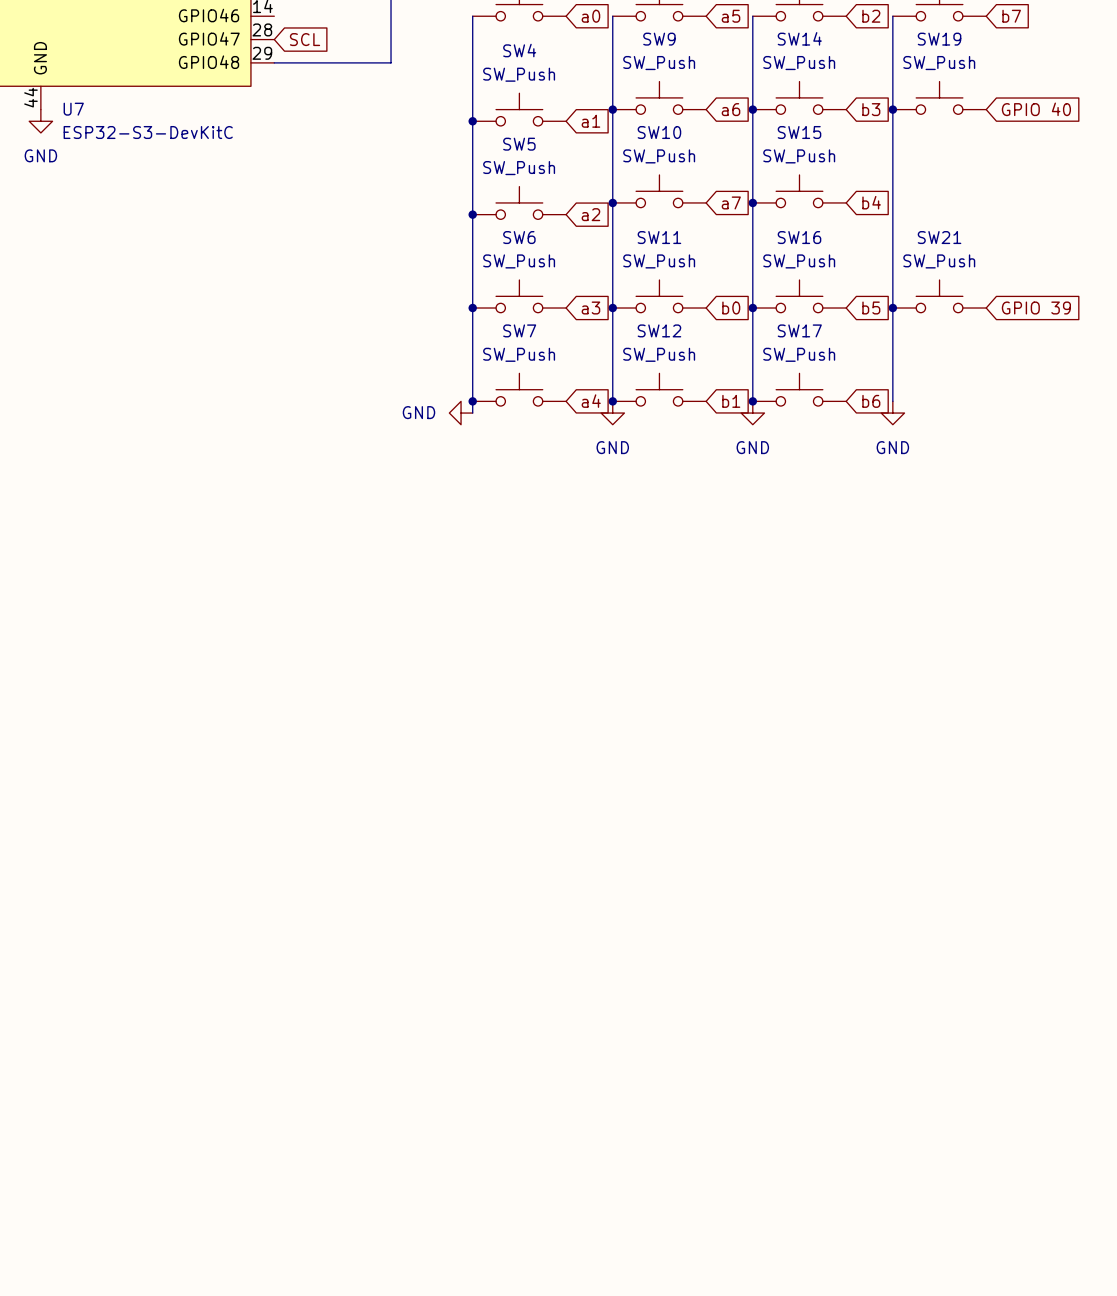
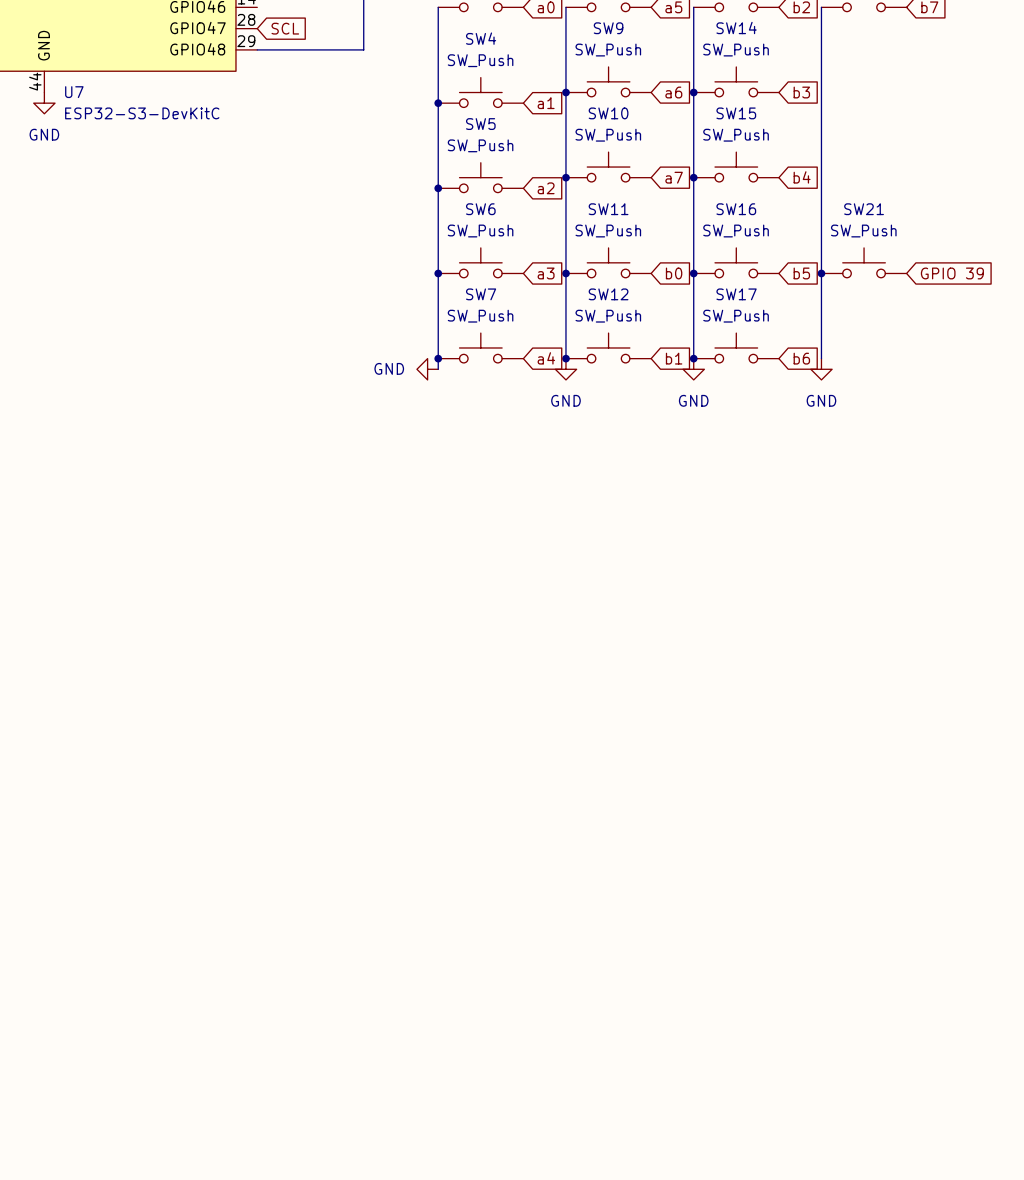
SW19: SW_Push (939, 97) -> none
junction: (892, 109) -> none
global label: GPIO 40 (1036, 109) -> none

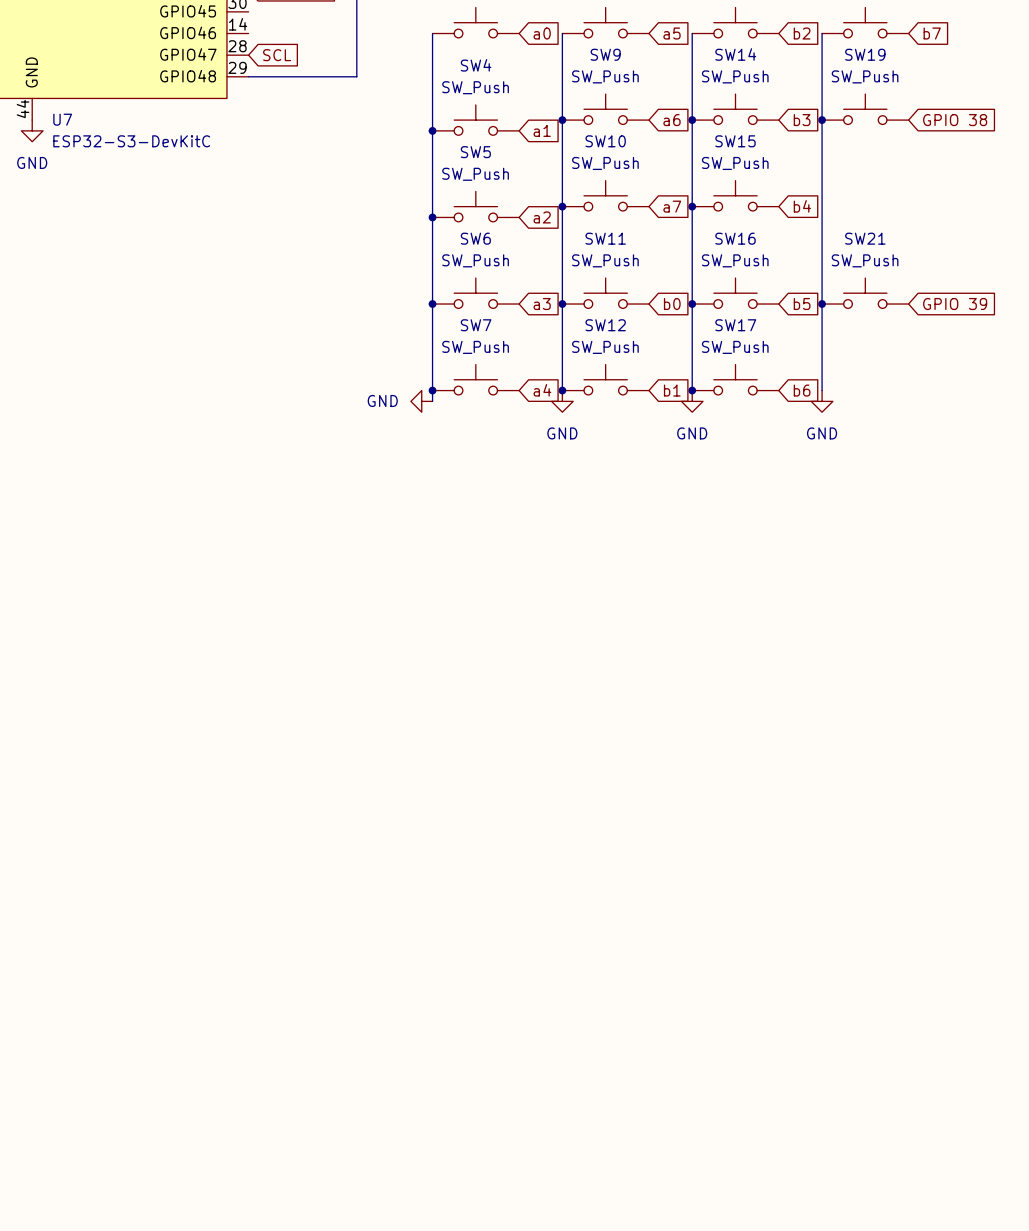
SW19: none -> SW_Push (865, 109)
junction: none -> (822, 120)
global label: none -> GPIO 38 (955, 120)

